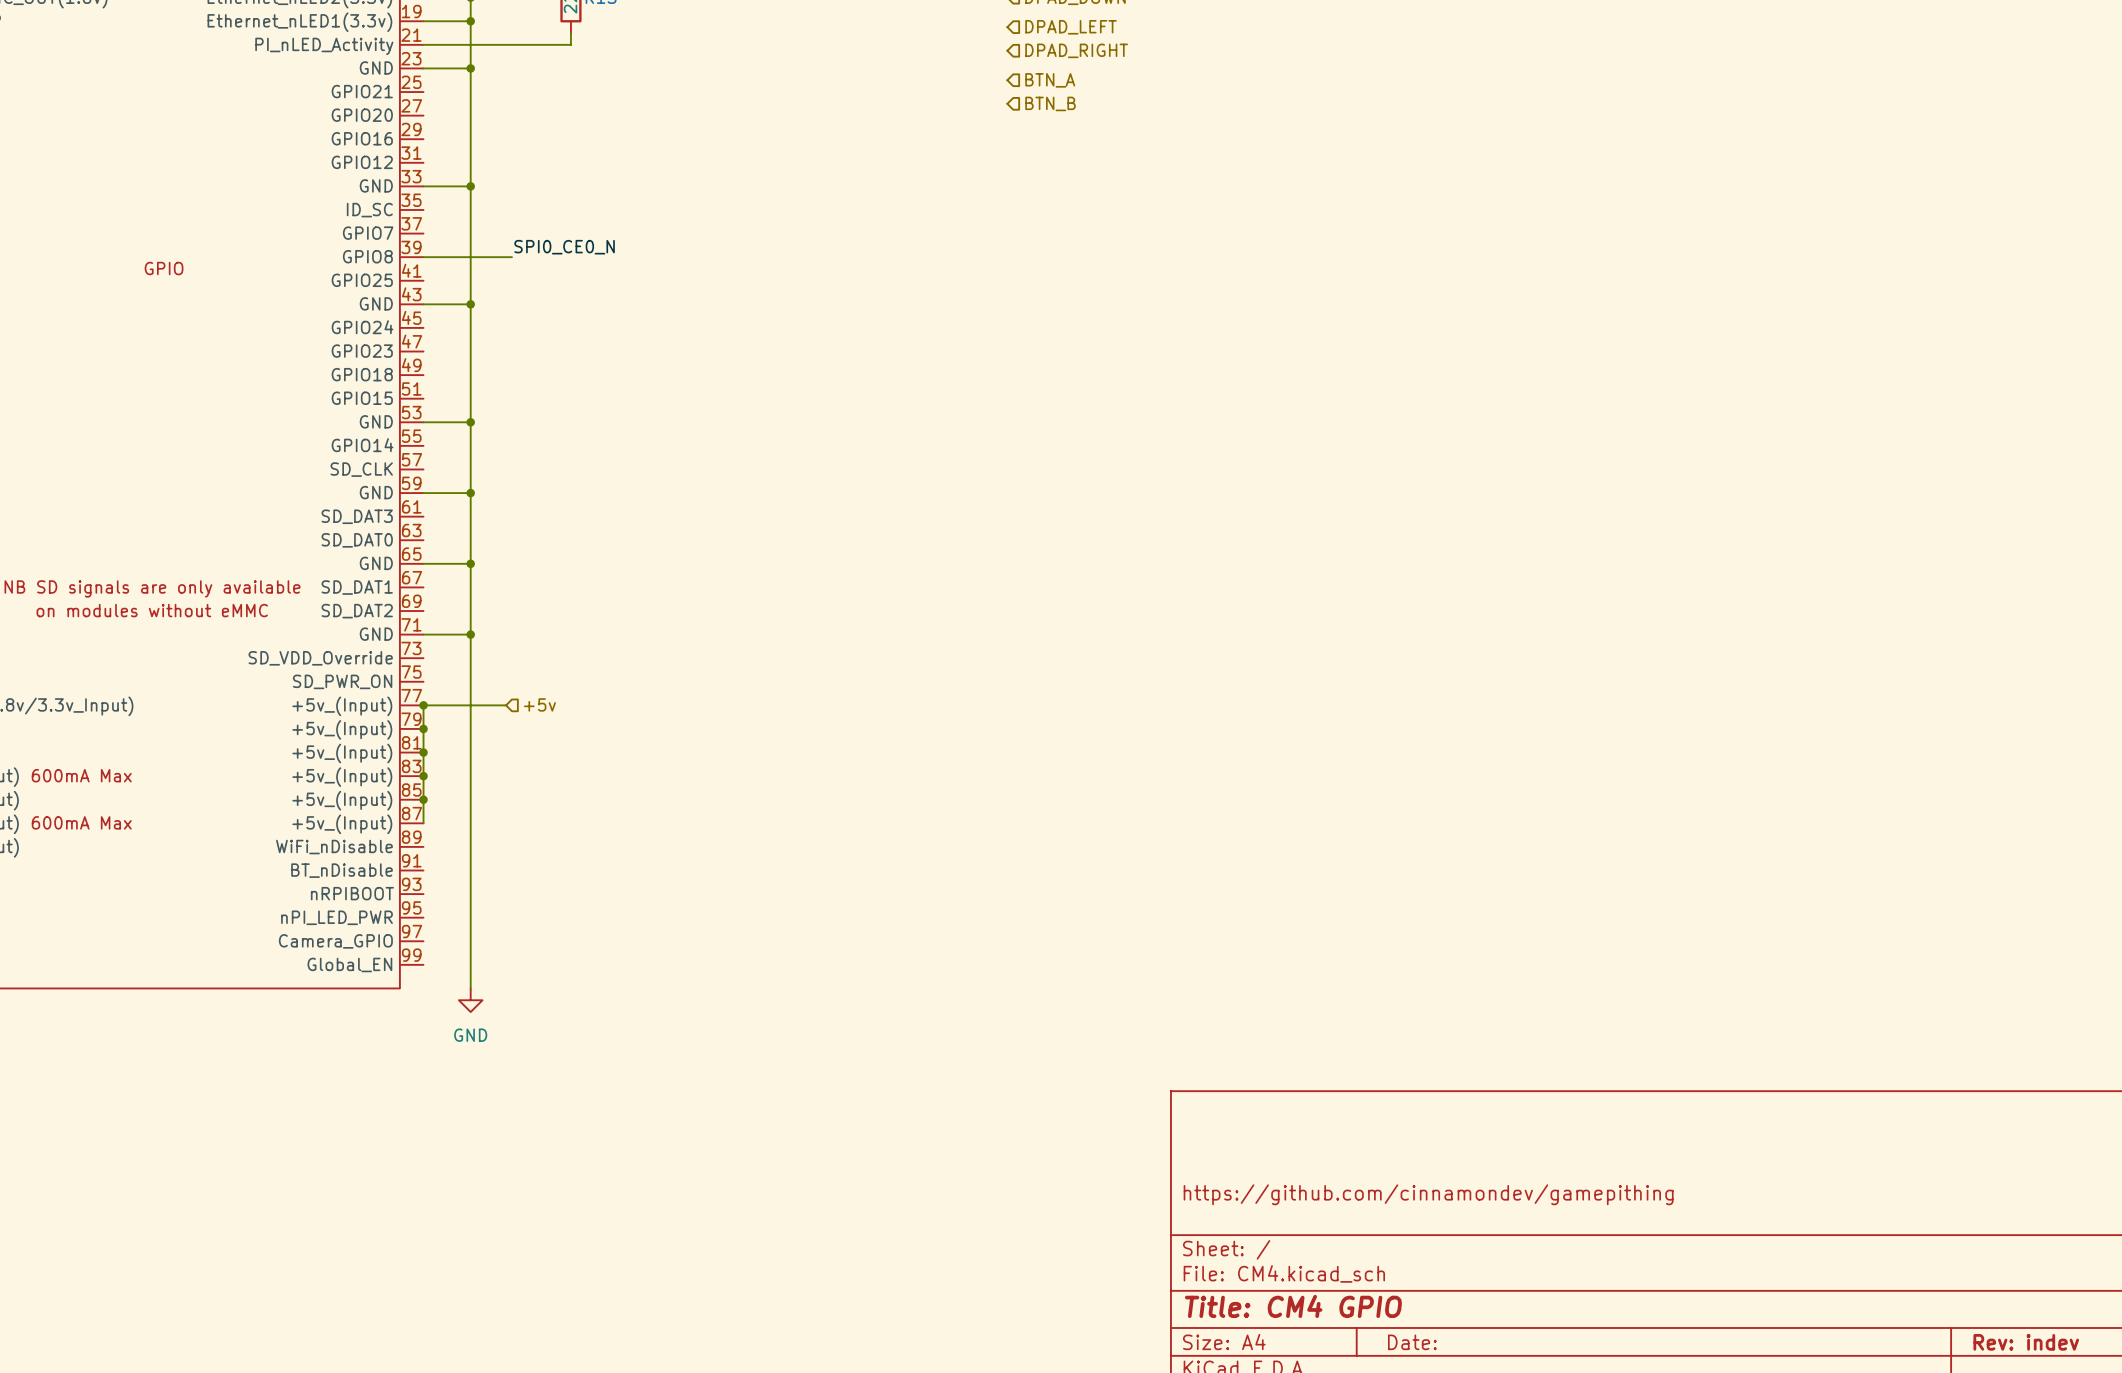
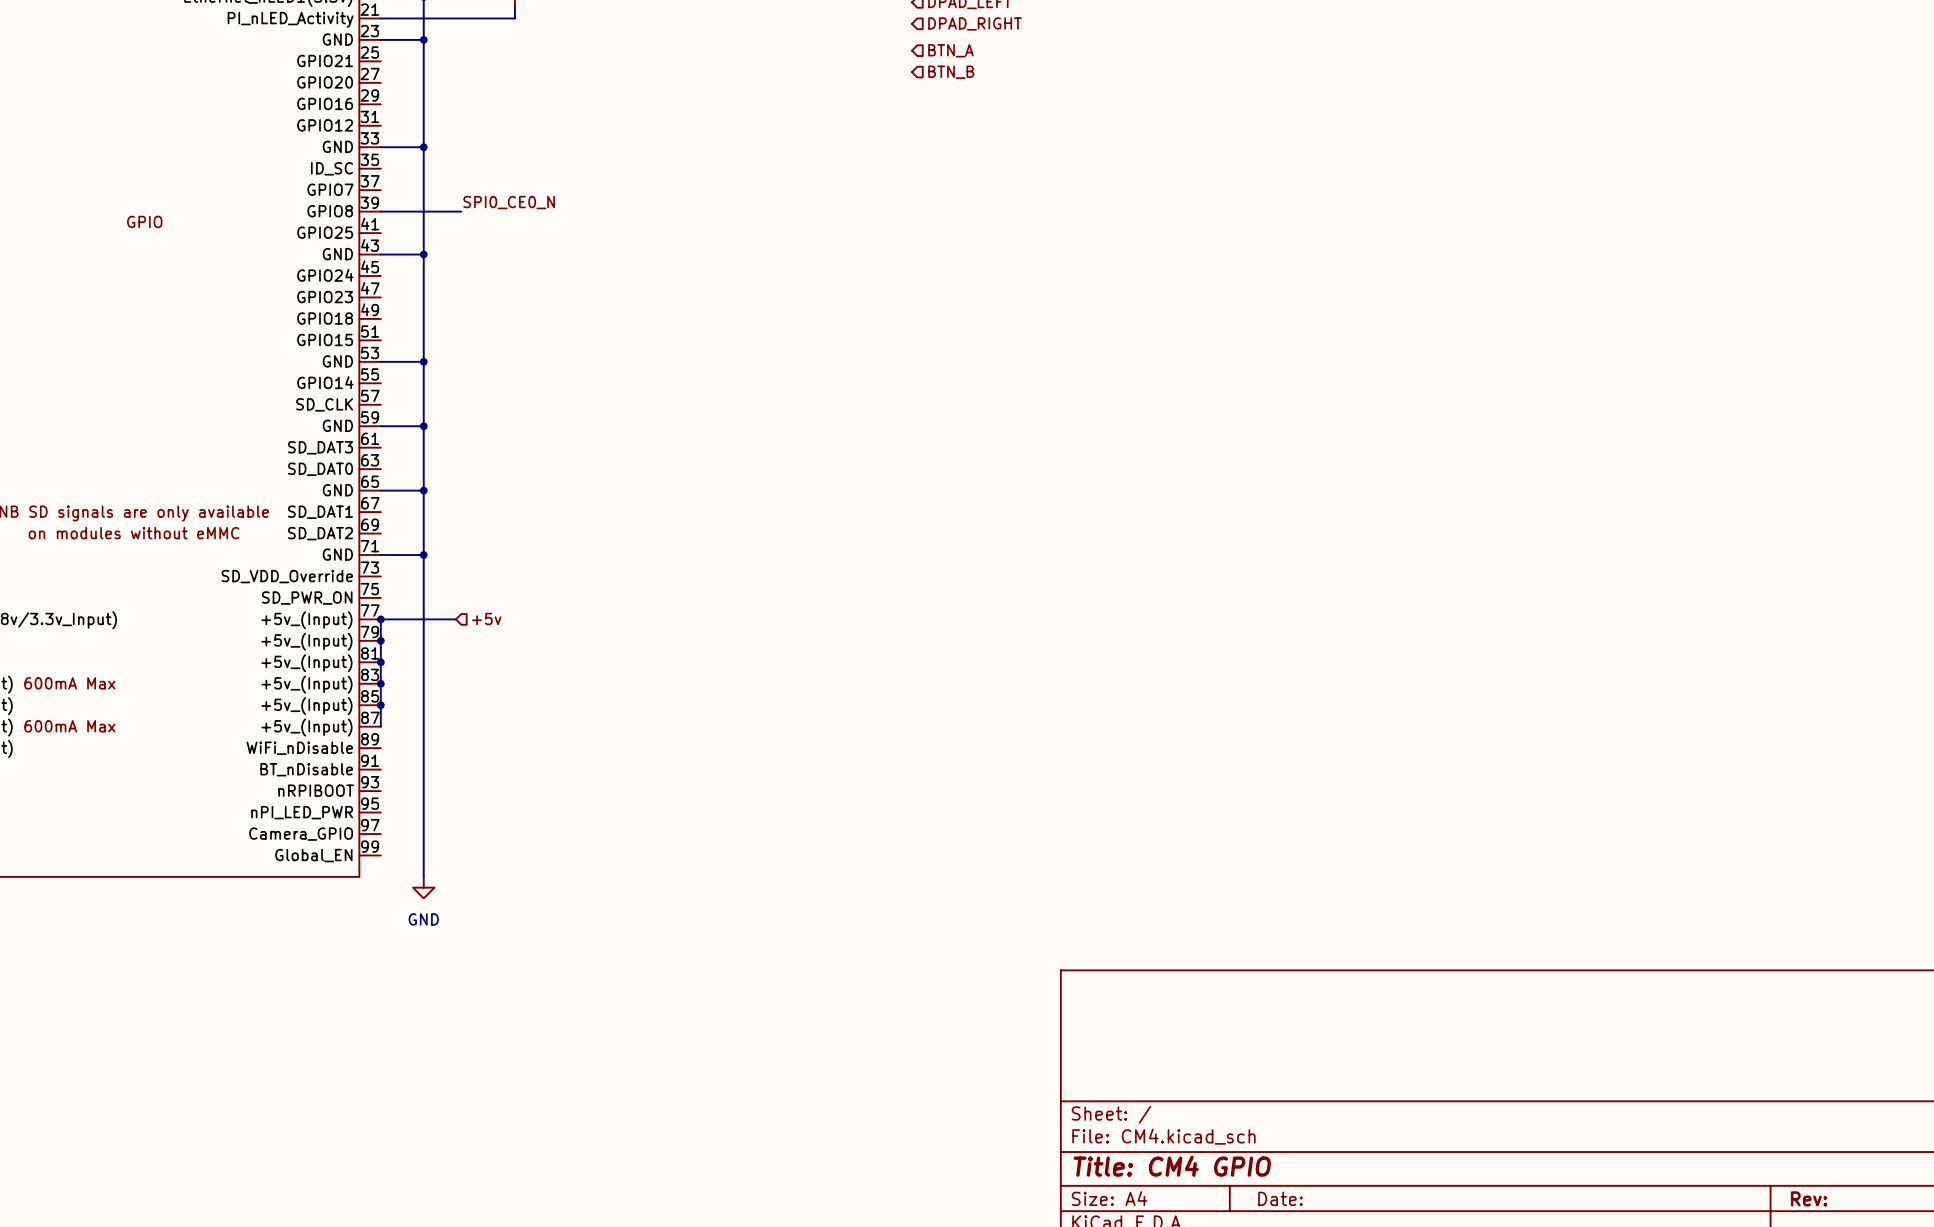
title block: https://github.com/cinnamondev/gamepithing (1428, 1194) -> none
title block: Rev: indev (2026, 1342) -> Rev: (1809, 1198)

